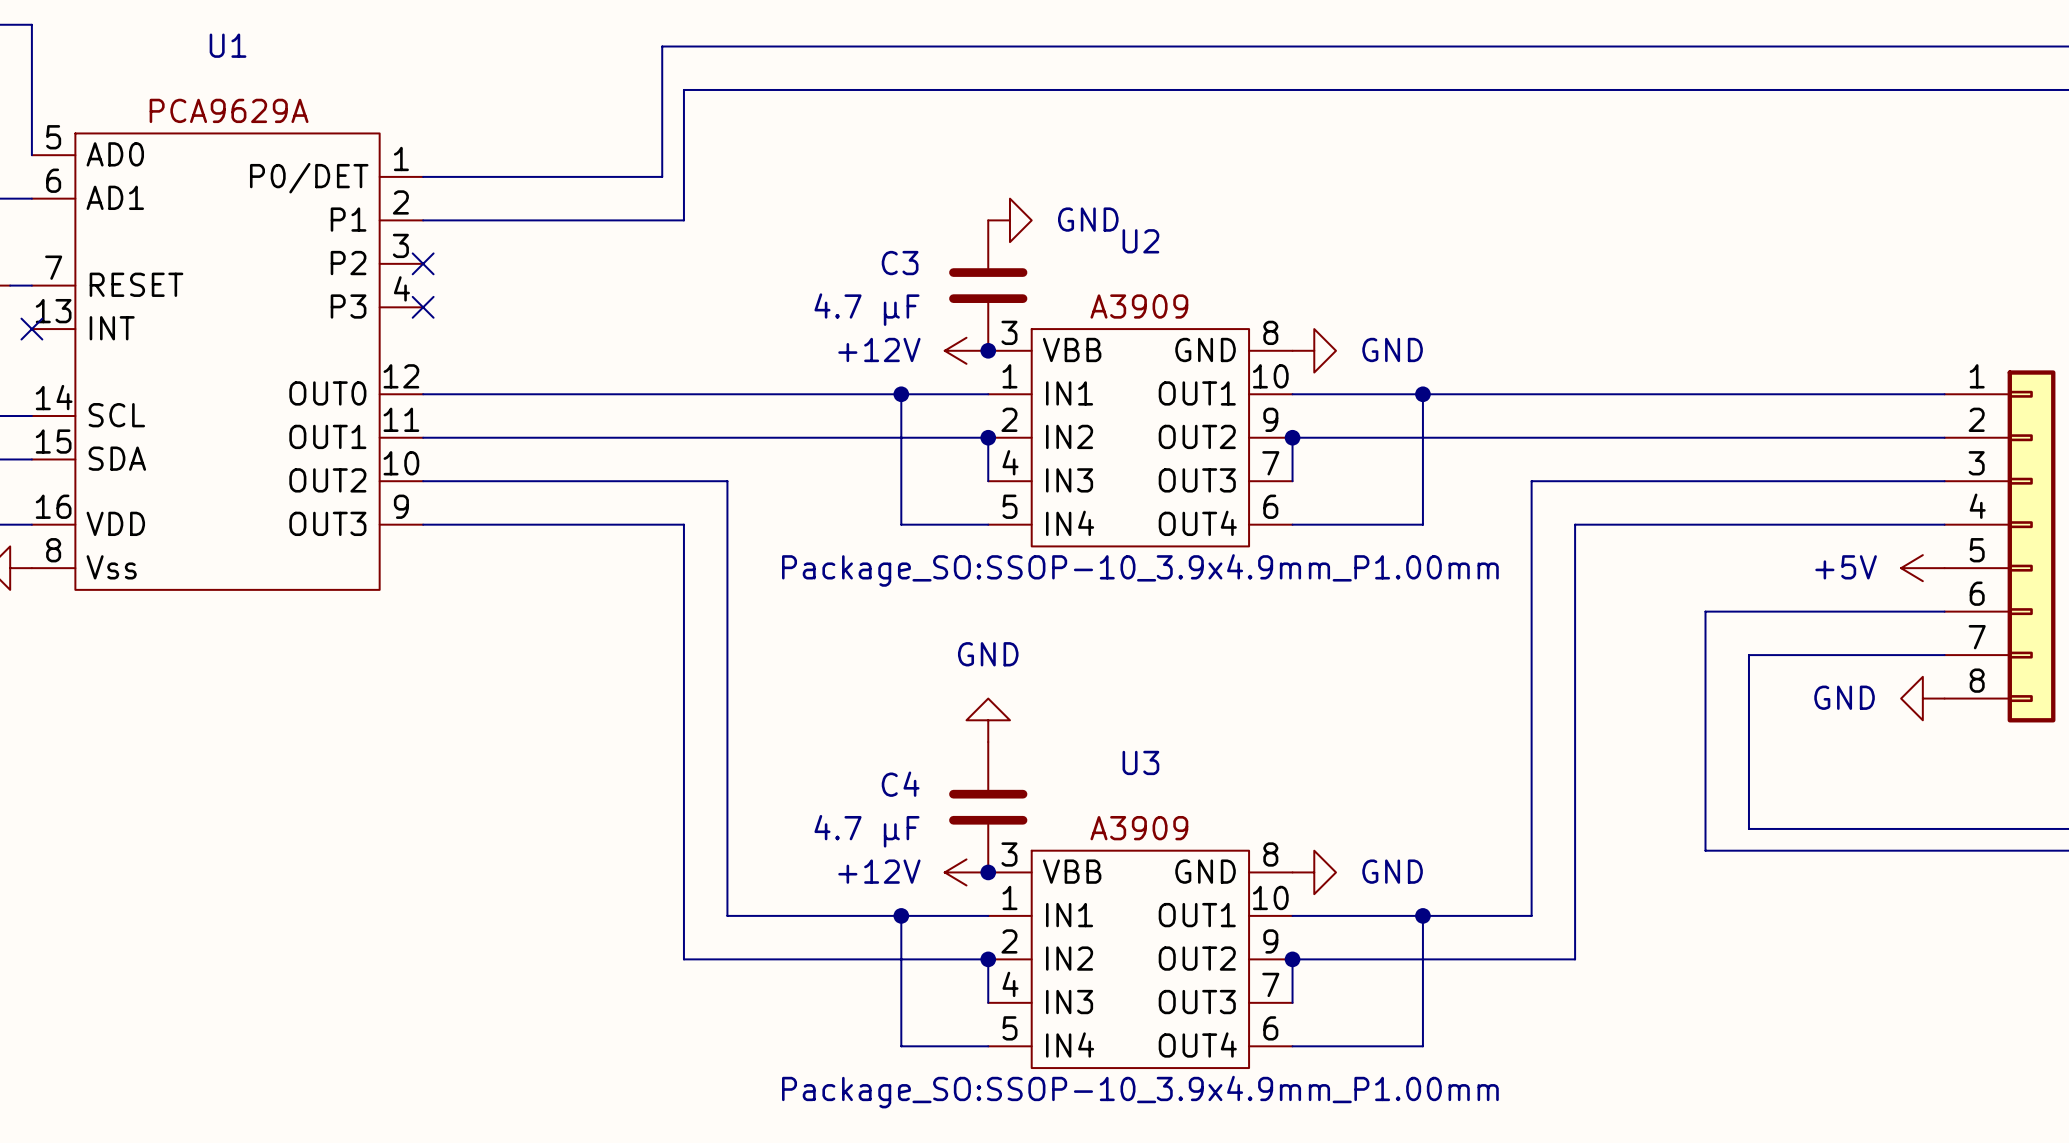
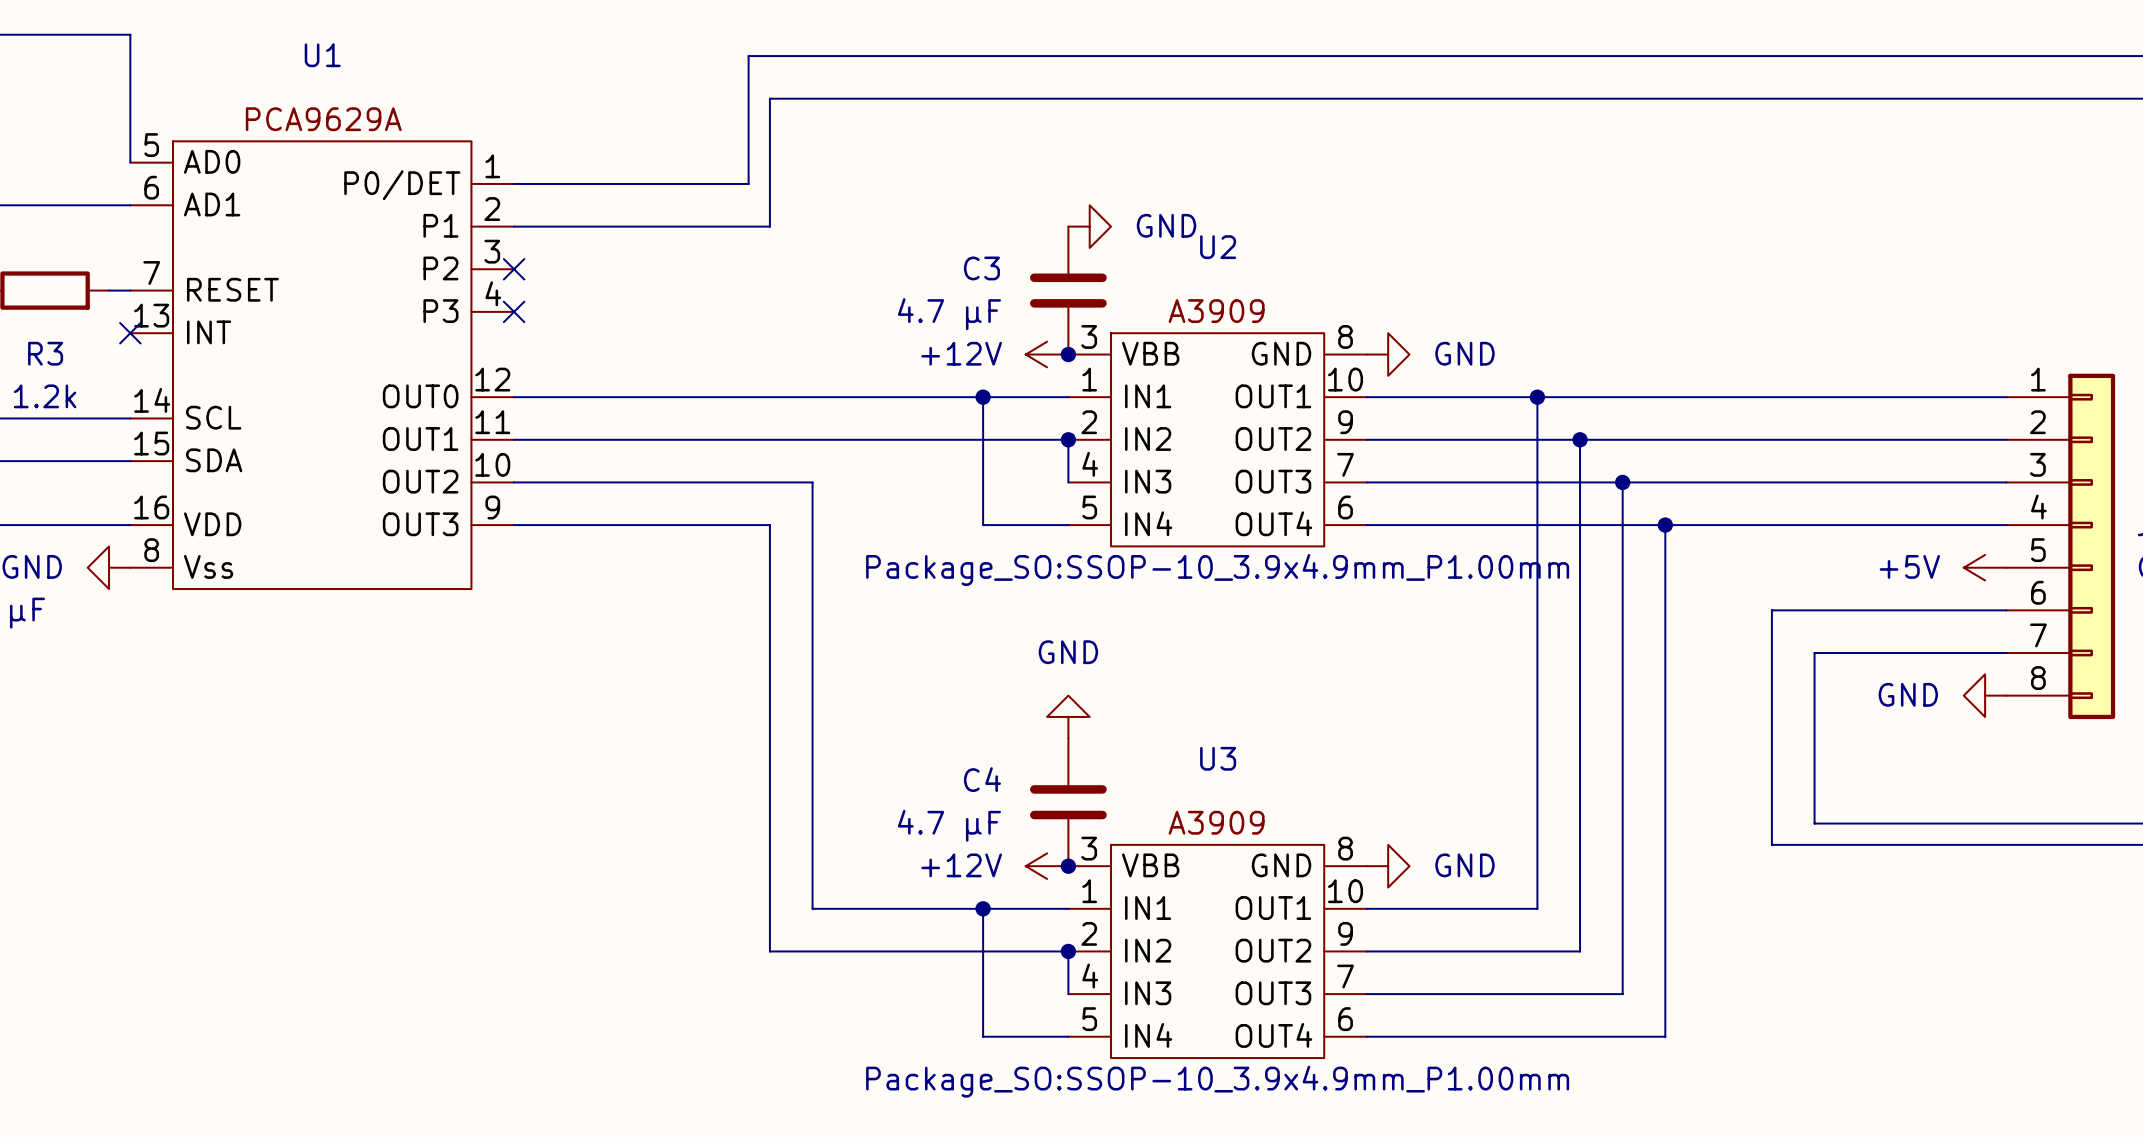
wire: (1422, 394) (1422, 524) -> (1644, 525) (1494, 525)
junction position: (1422, 394) -> (1537, 397)
wire: (1292, 437) (1292, 481) -> (1601, 482) (1366, 482)
junction: (1292, 437) -> none
junction: none -> (1580, 439)
wire: (1531, 481) (1531, 915) (1466, 915) -> (1537, 397) (1537, 908)
junction: none -> (1622, 482)
wire: (1575, 524) (1575, 959) (1509, 959) -> (1580, 439) (1580, 951)
junction: none -> (1665, 525)
wire: (1422, 915) (1422, 1046) -> (1665, 525) (1665, 1036) (1494, 1036)
junction: (1422, 915) -> none
wire: (1292, 959) (1292, 1002) -> (1622, 482) (1622, 994) (1366, 994)
junction: (1292, 959) -> none

